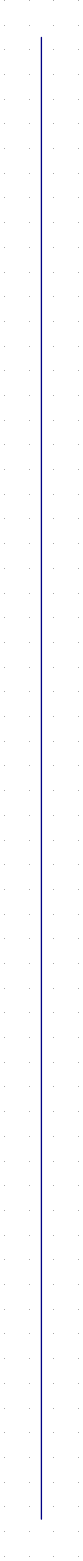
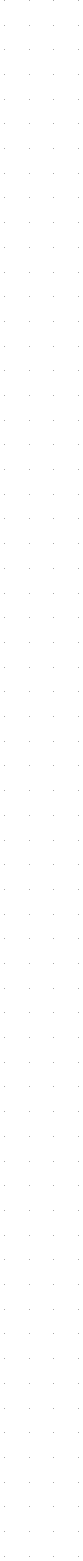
line: (41, 37) (41, 1519) -> none

